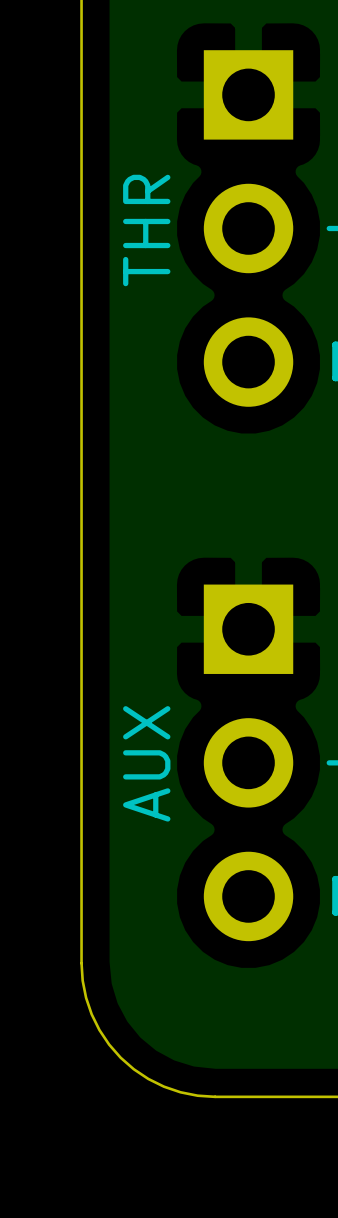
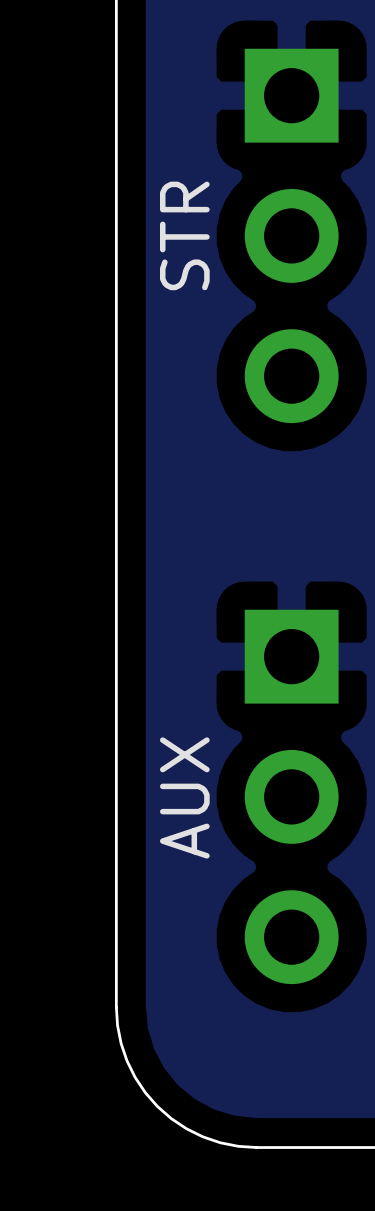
text: THR (146, 230) -> STR (184, 235)

